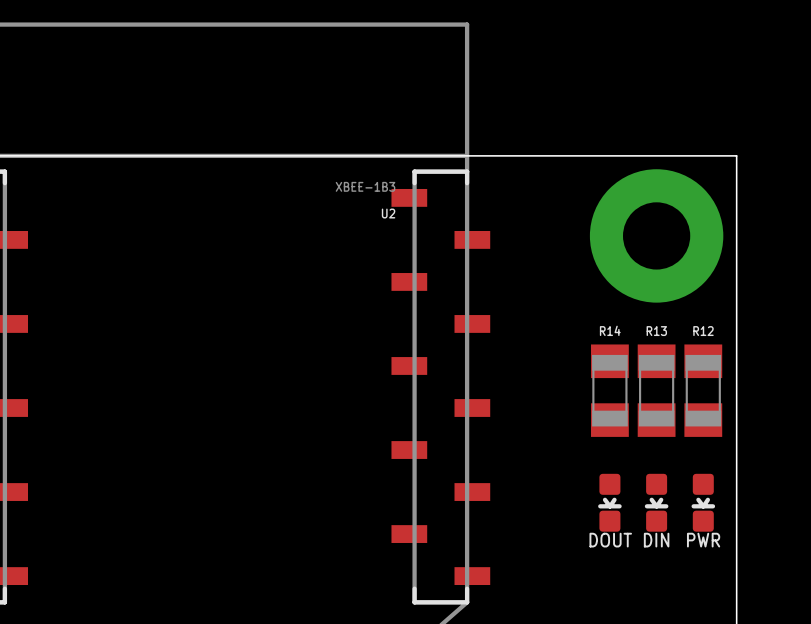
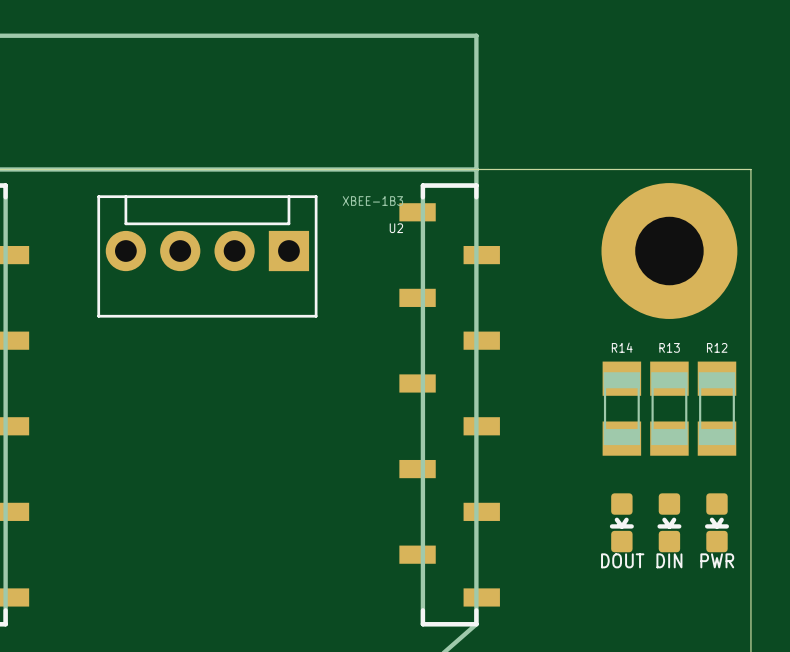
part: none -> (207, 256)

